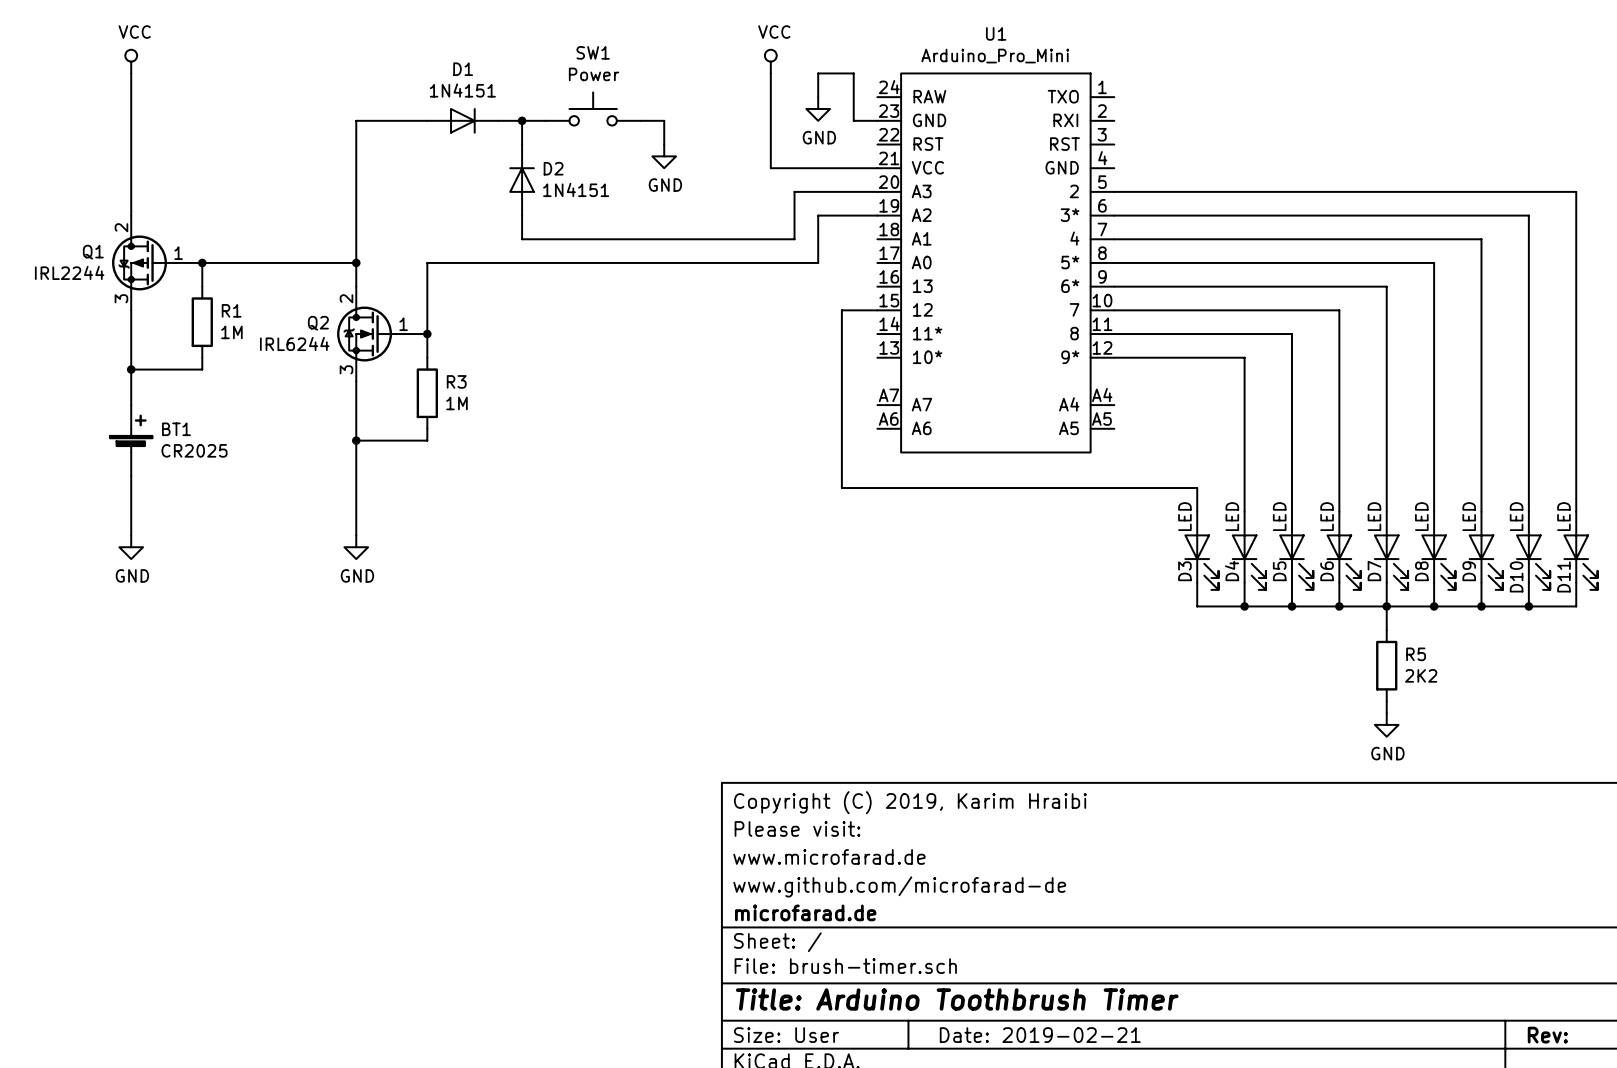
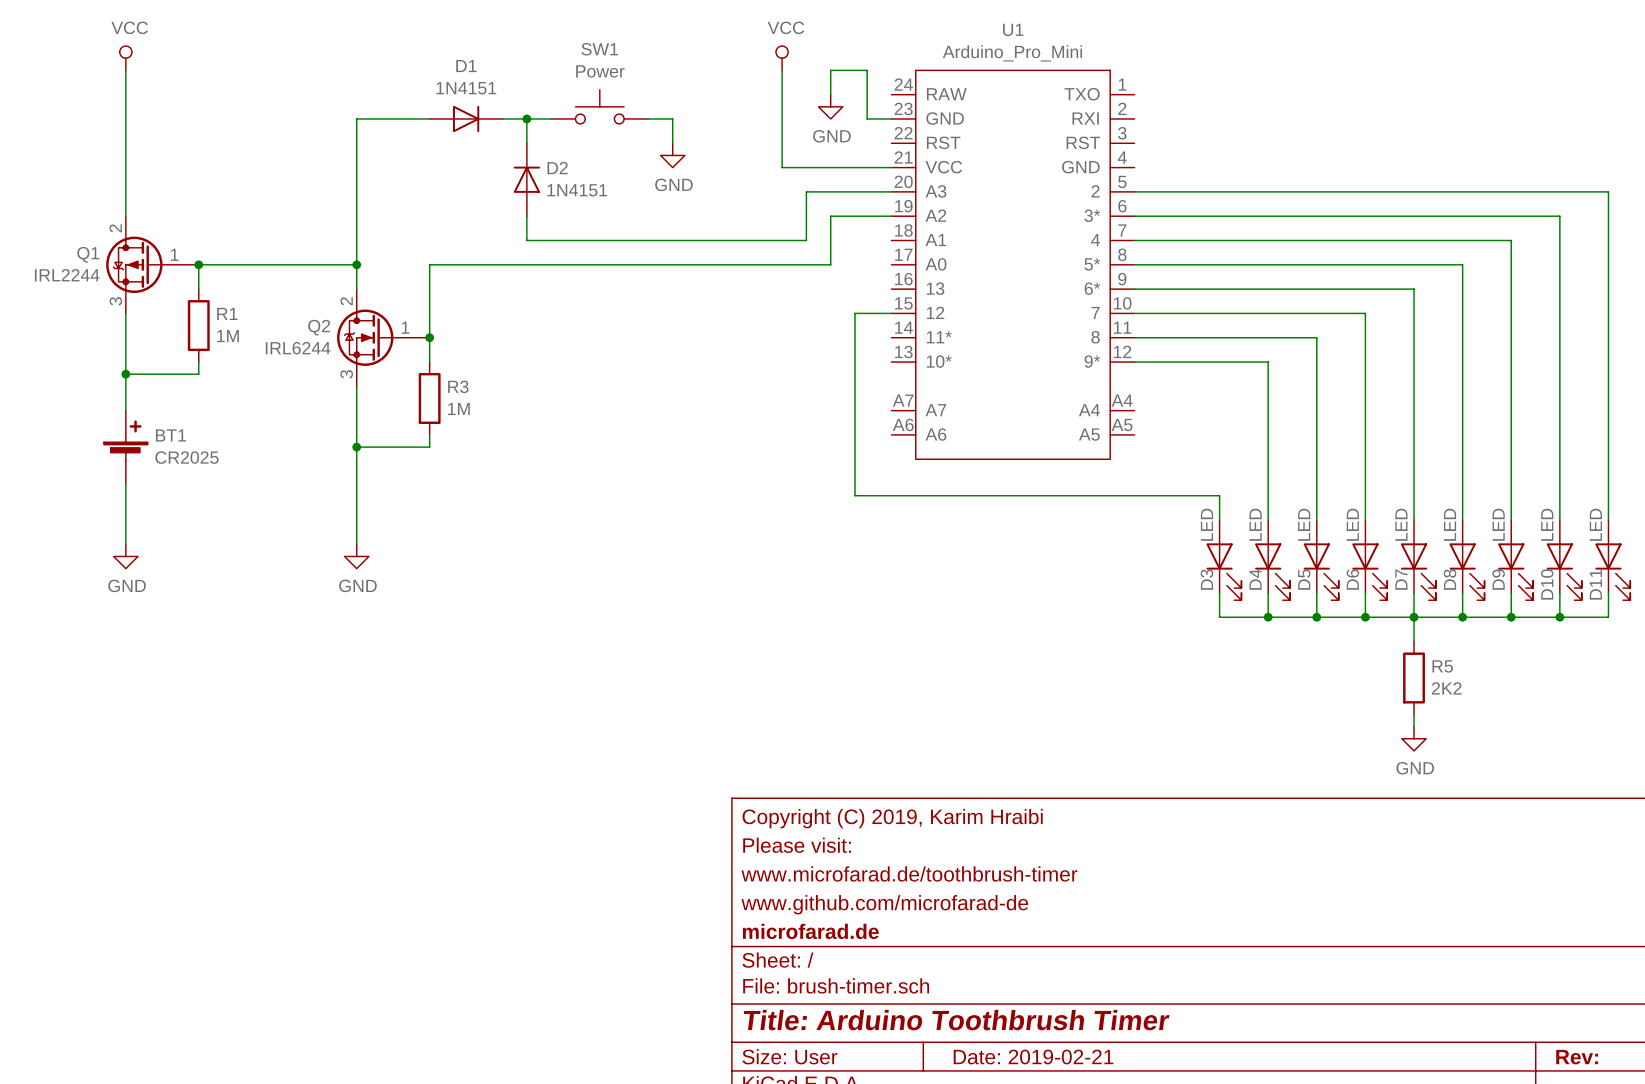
title block: www.microfarad.de (829, 856) -> www.microfarad.de/toothbrush-timer (909, 873)

